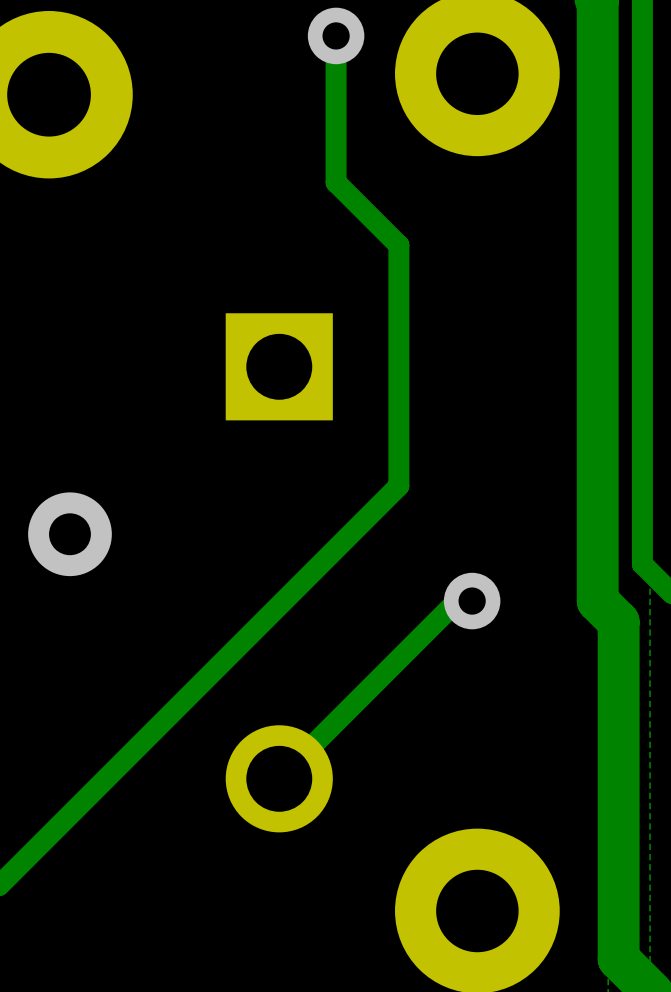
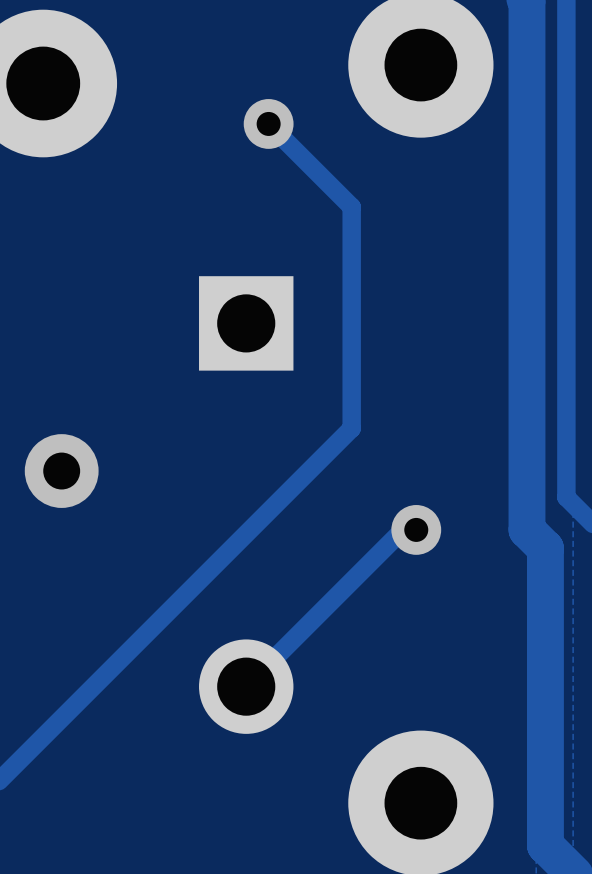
track: (336, 35) (336, 182) (398, 245) -> (268, 123) (351, 206) (351, 216)
via position: (336, 35) -> (268, 123)

